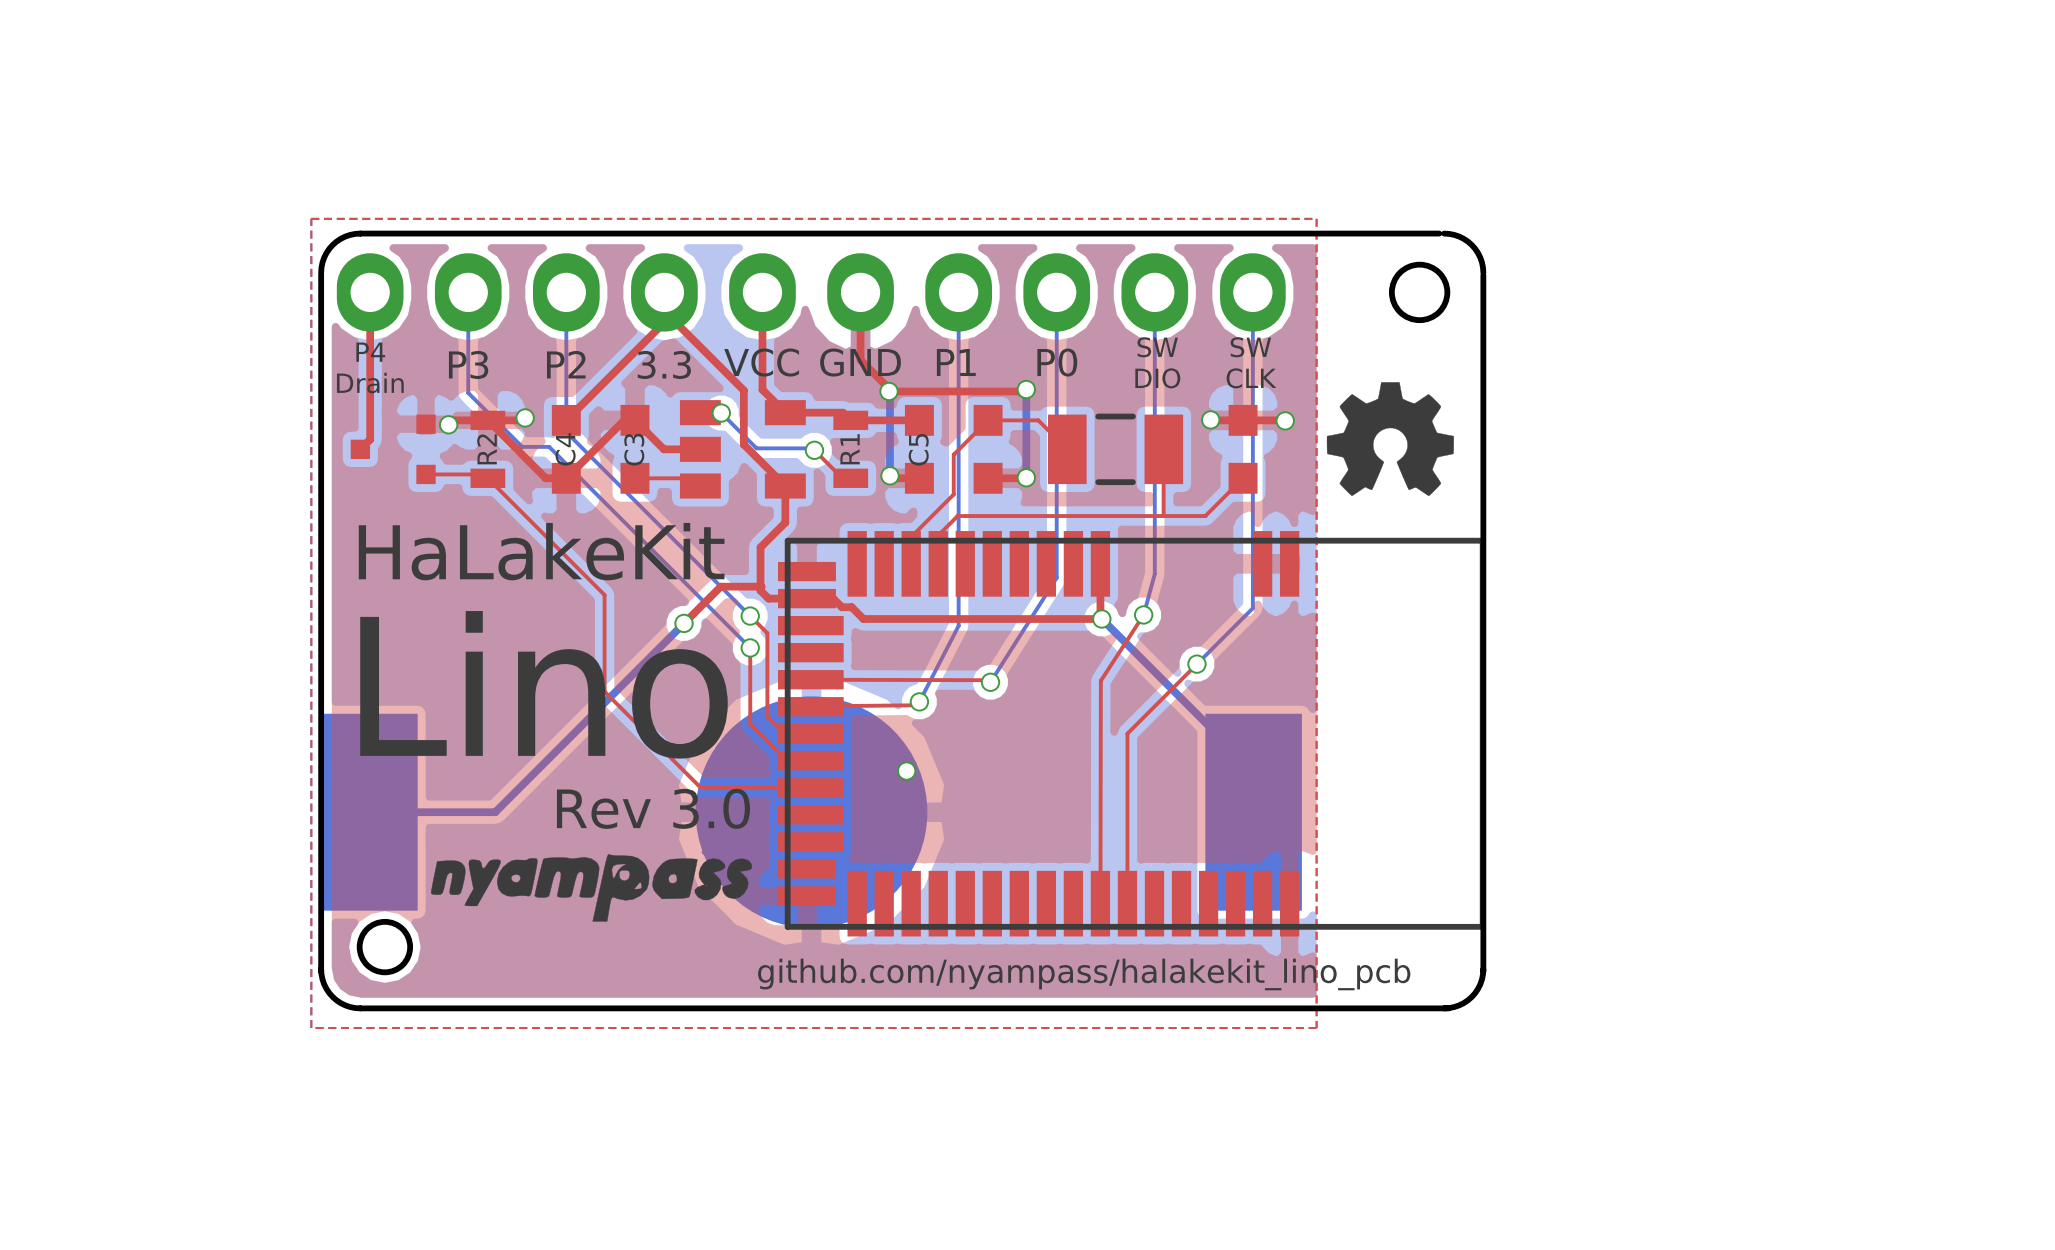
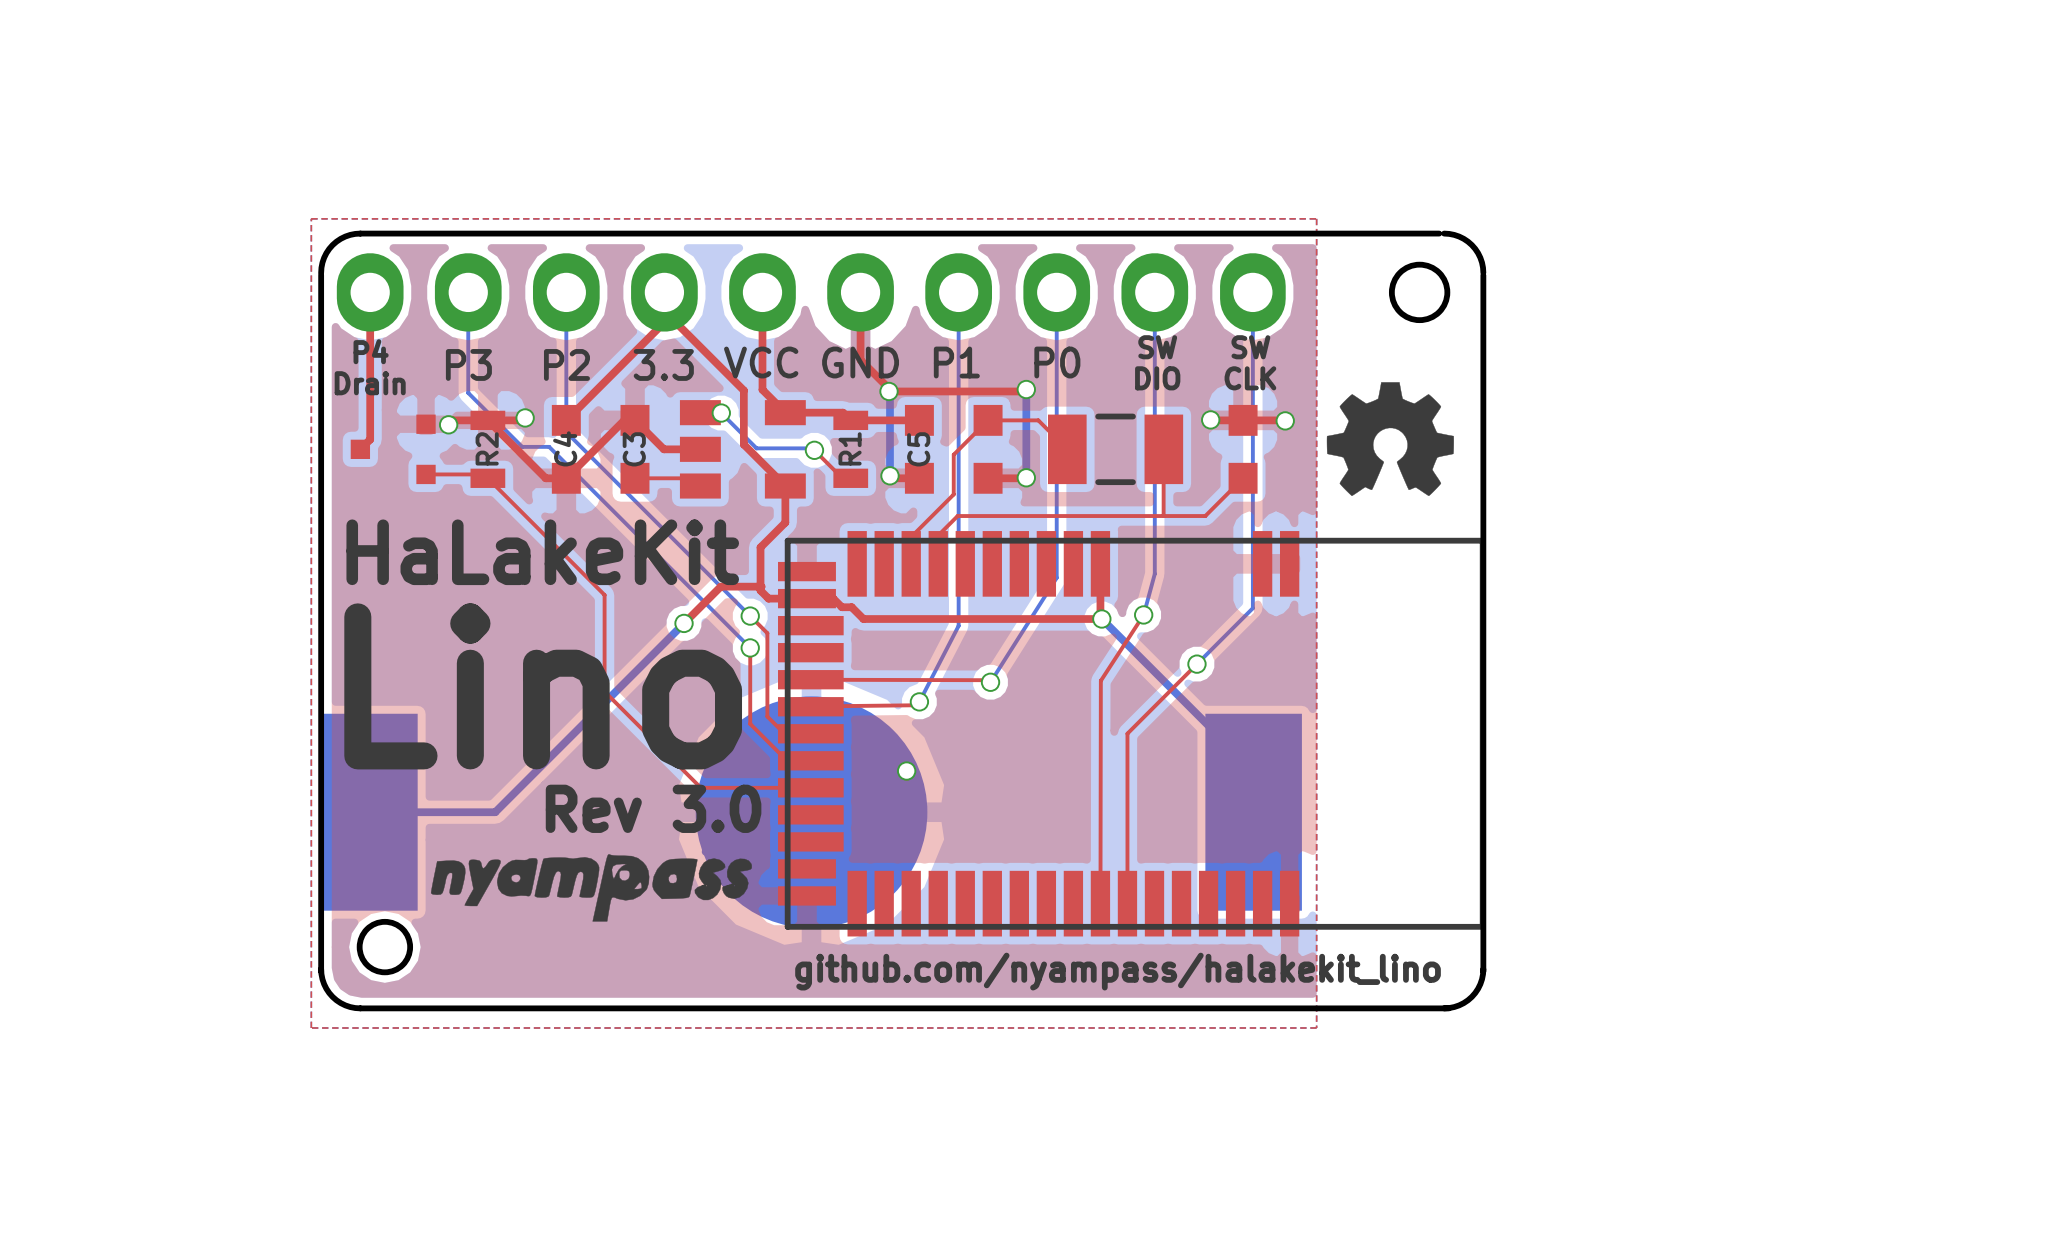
text: github.com/nyampass/halakekit_lino_pcb (1084, 974) -> github.com/nyampass/halakekit_lino (1118, 971)

